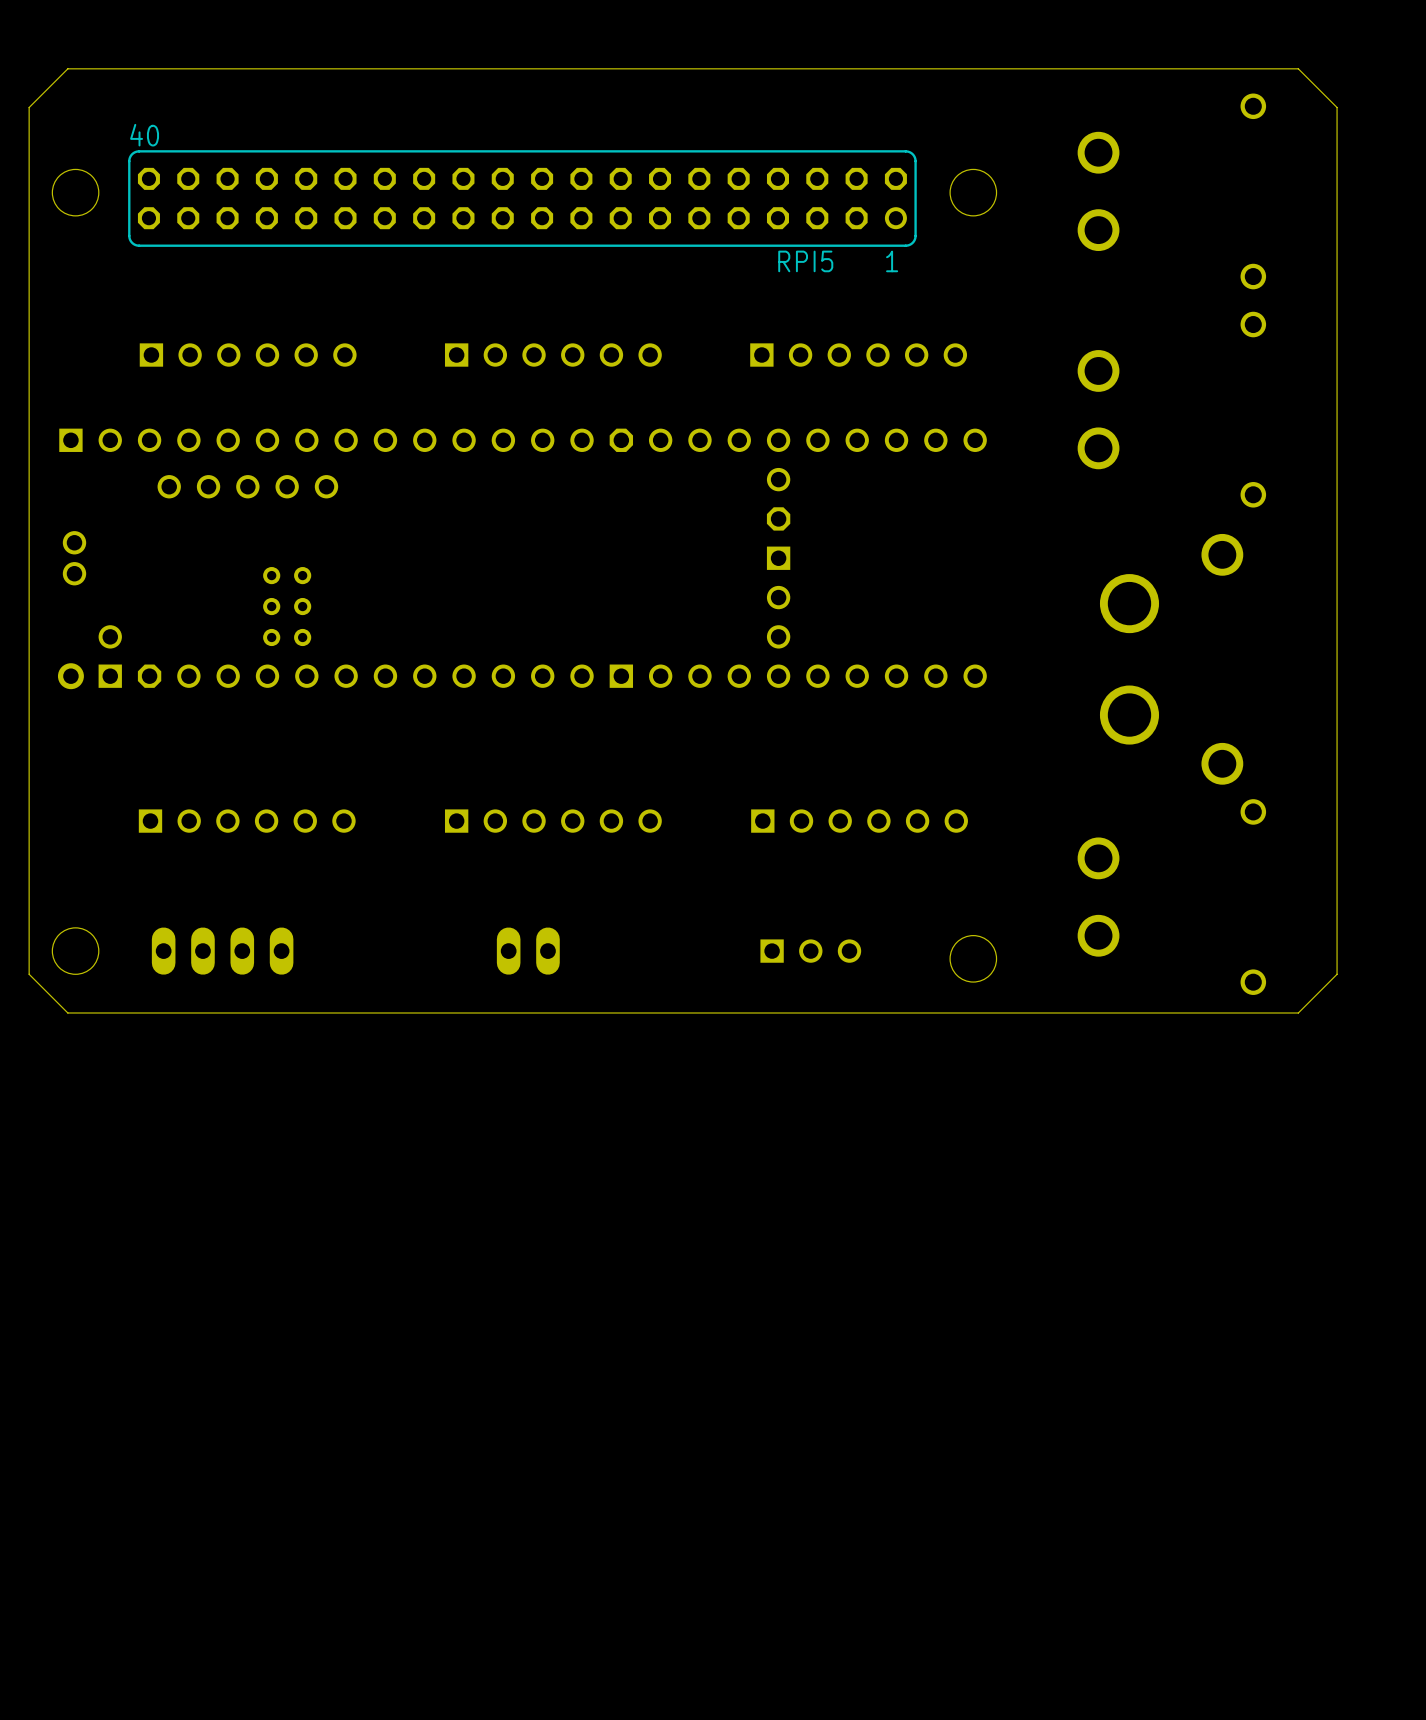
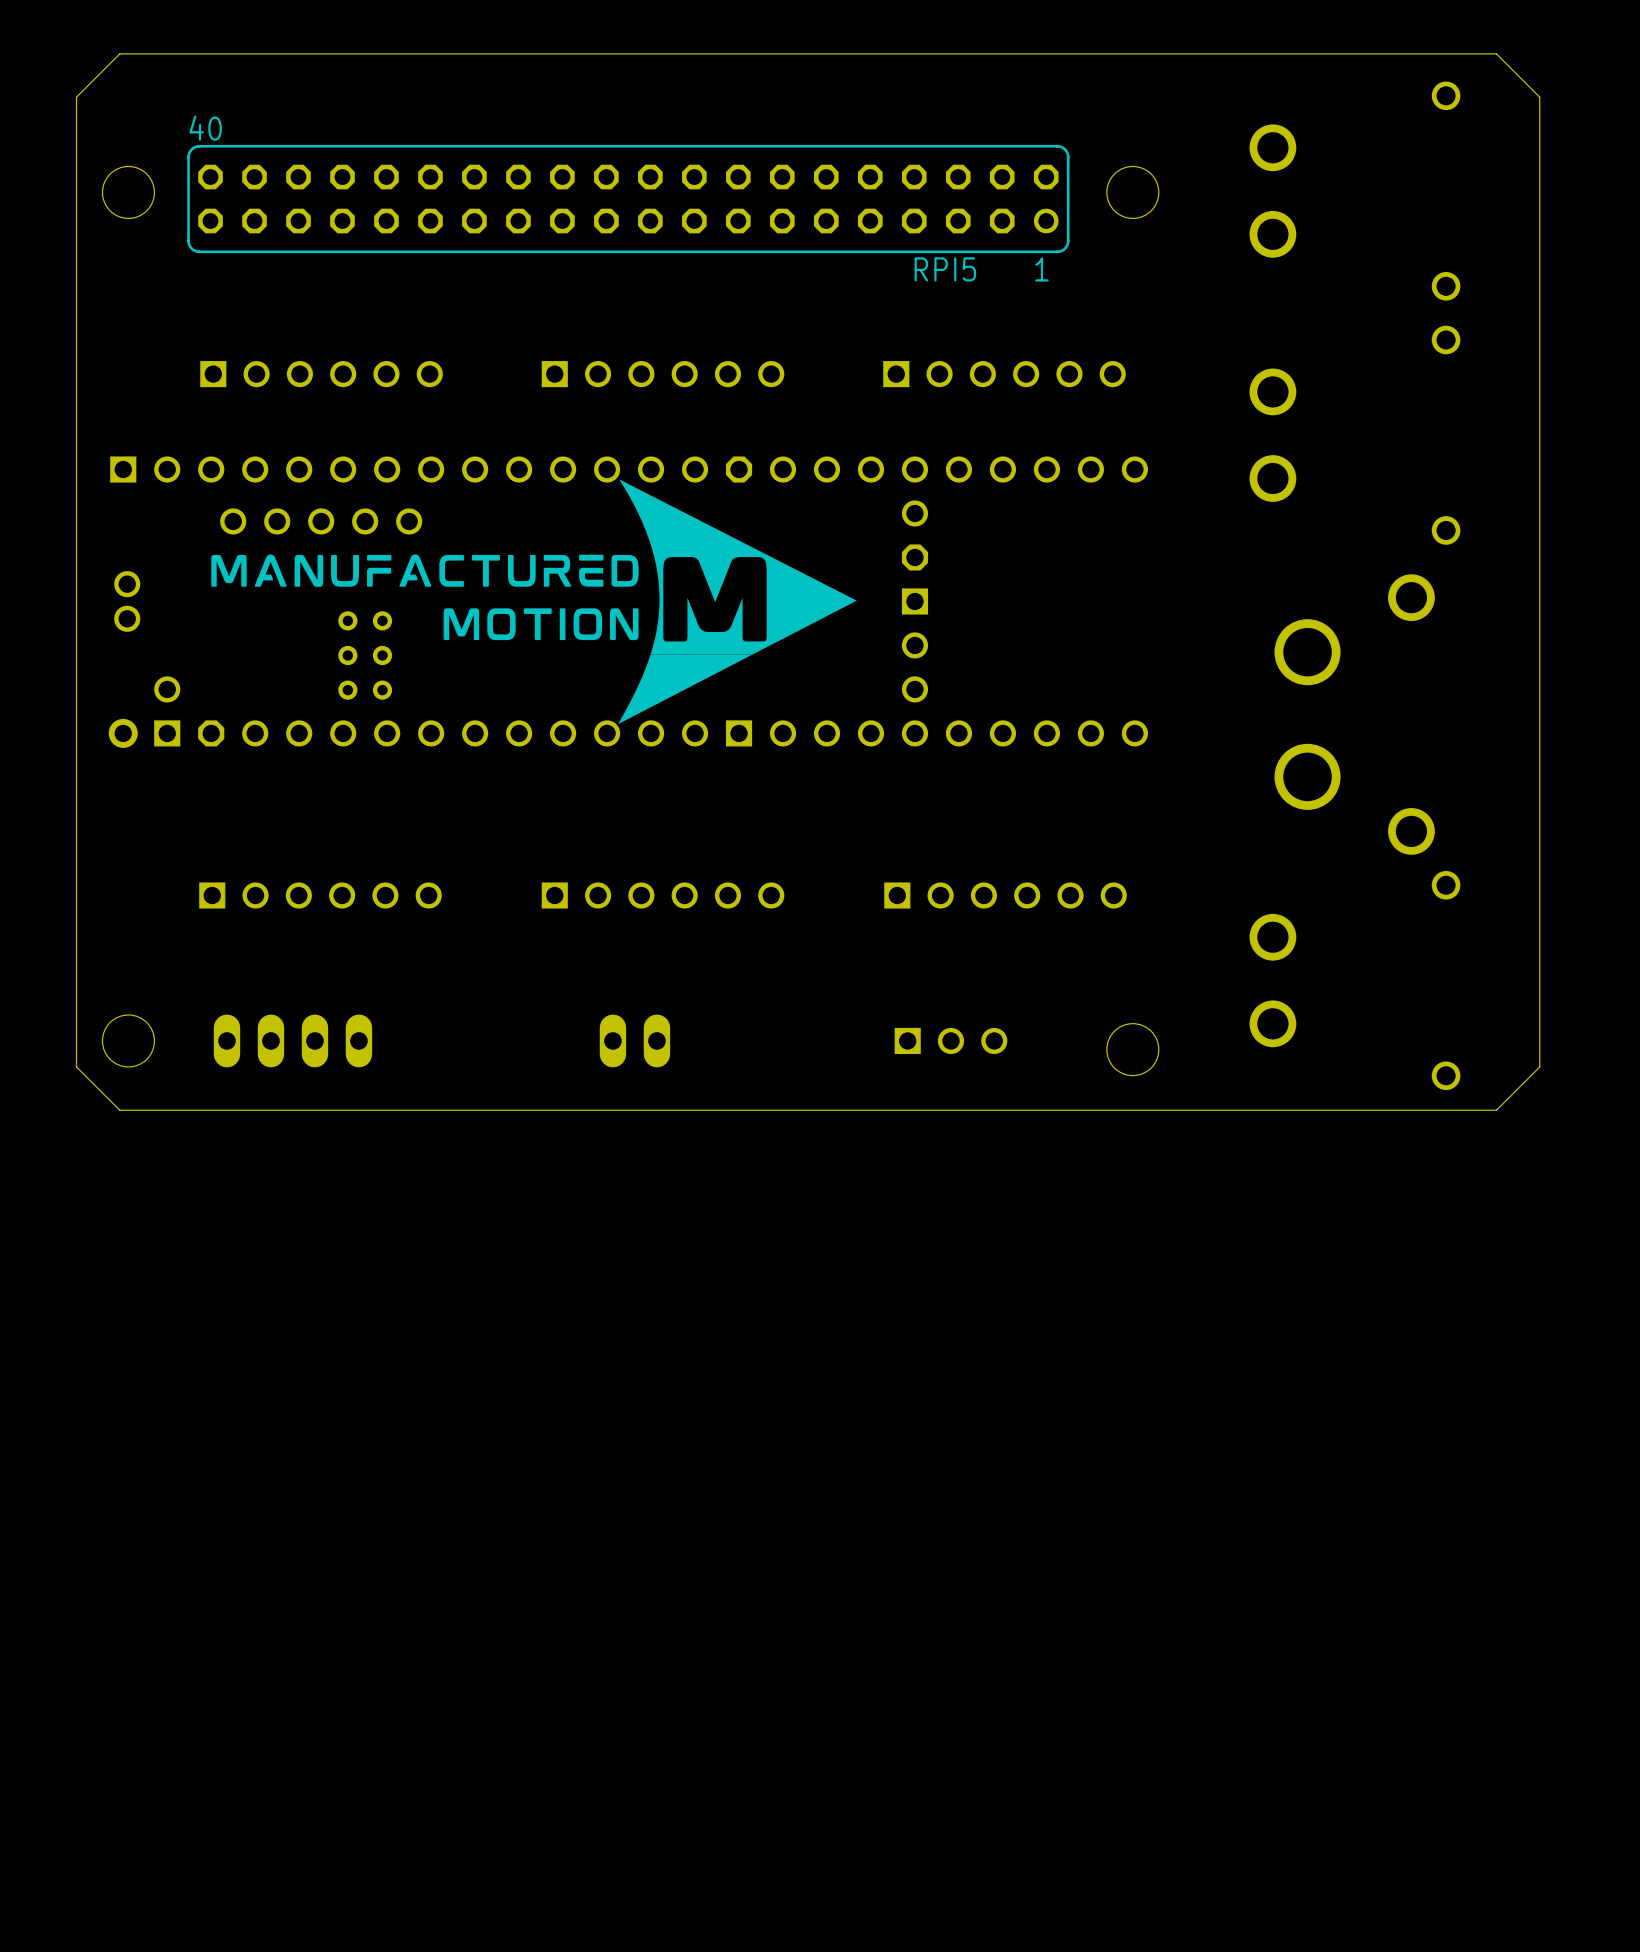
drawing: none -> [211, 479, 857, 724]

